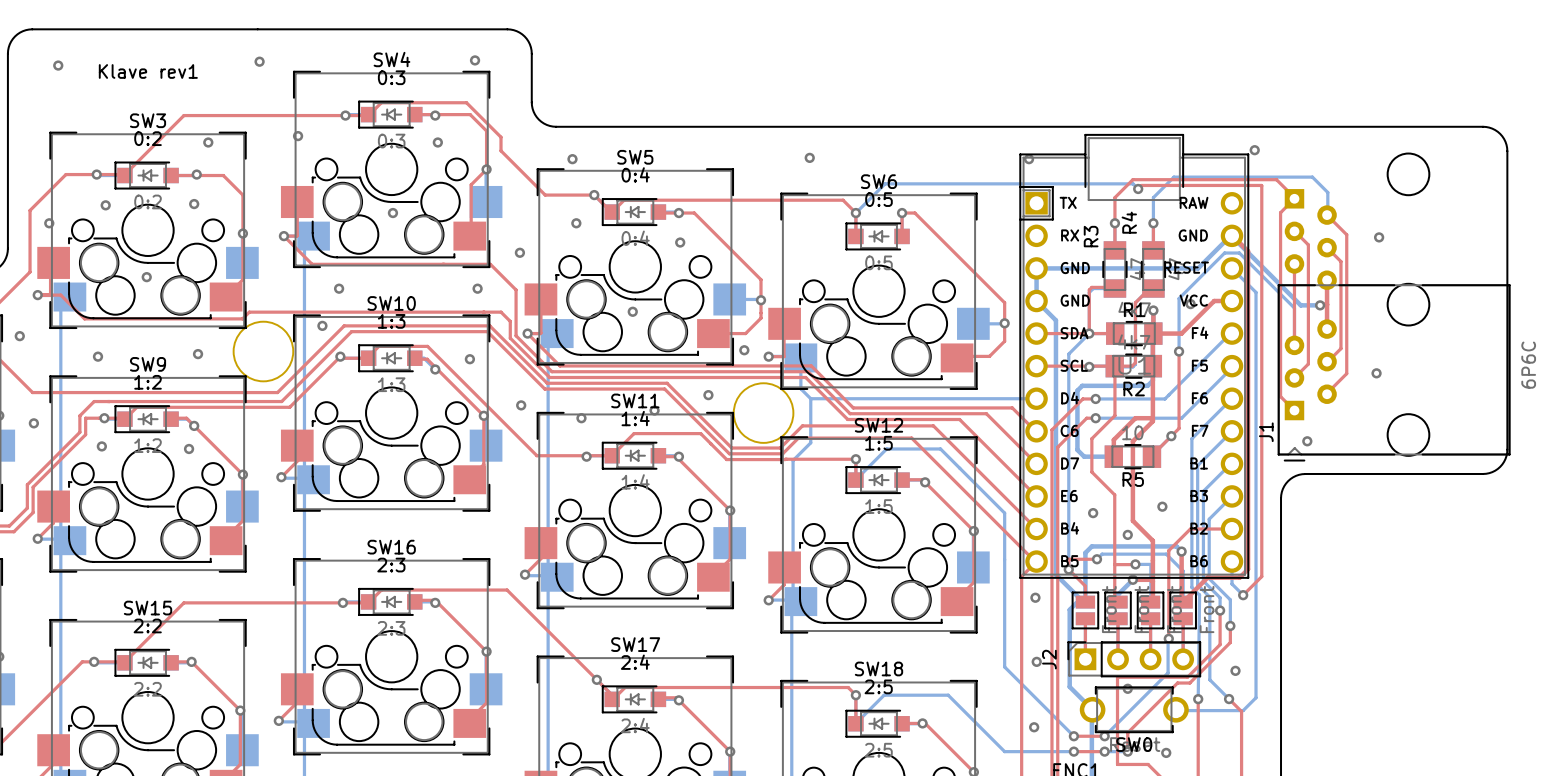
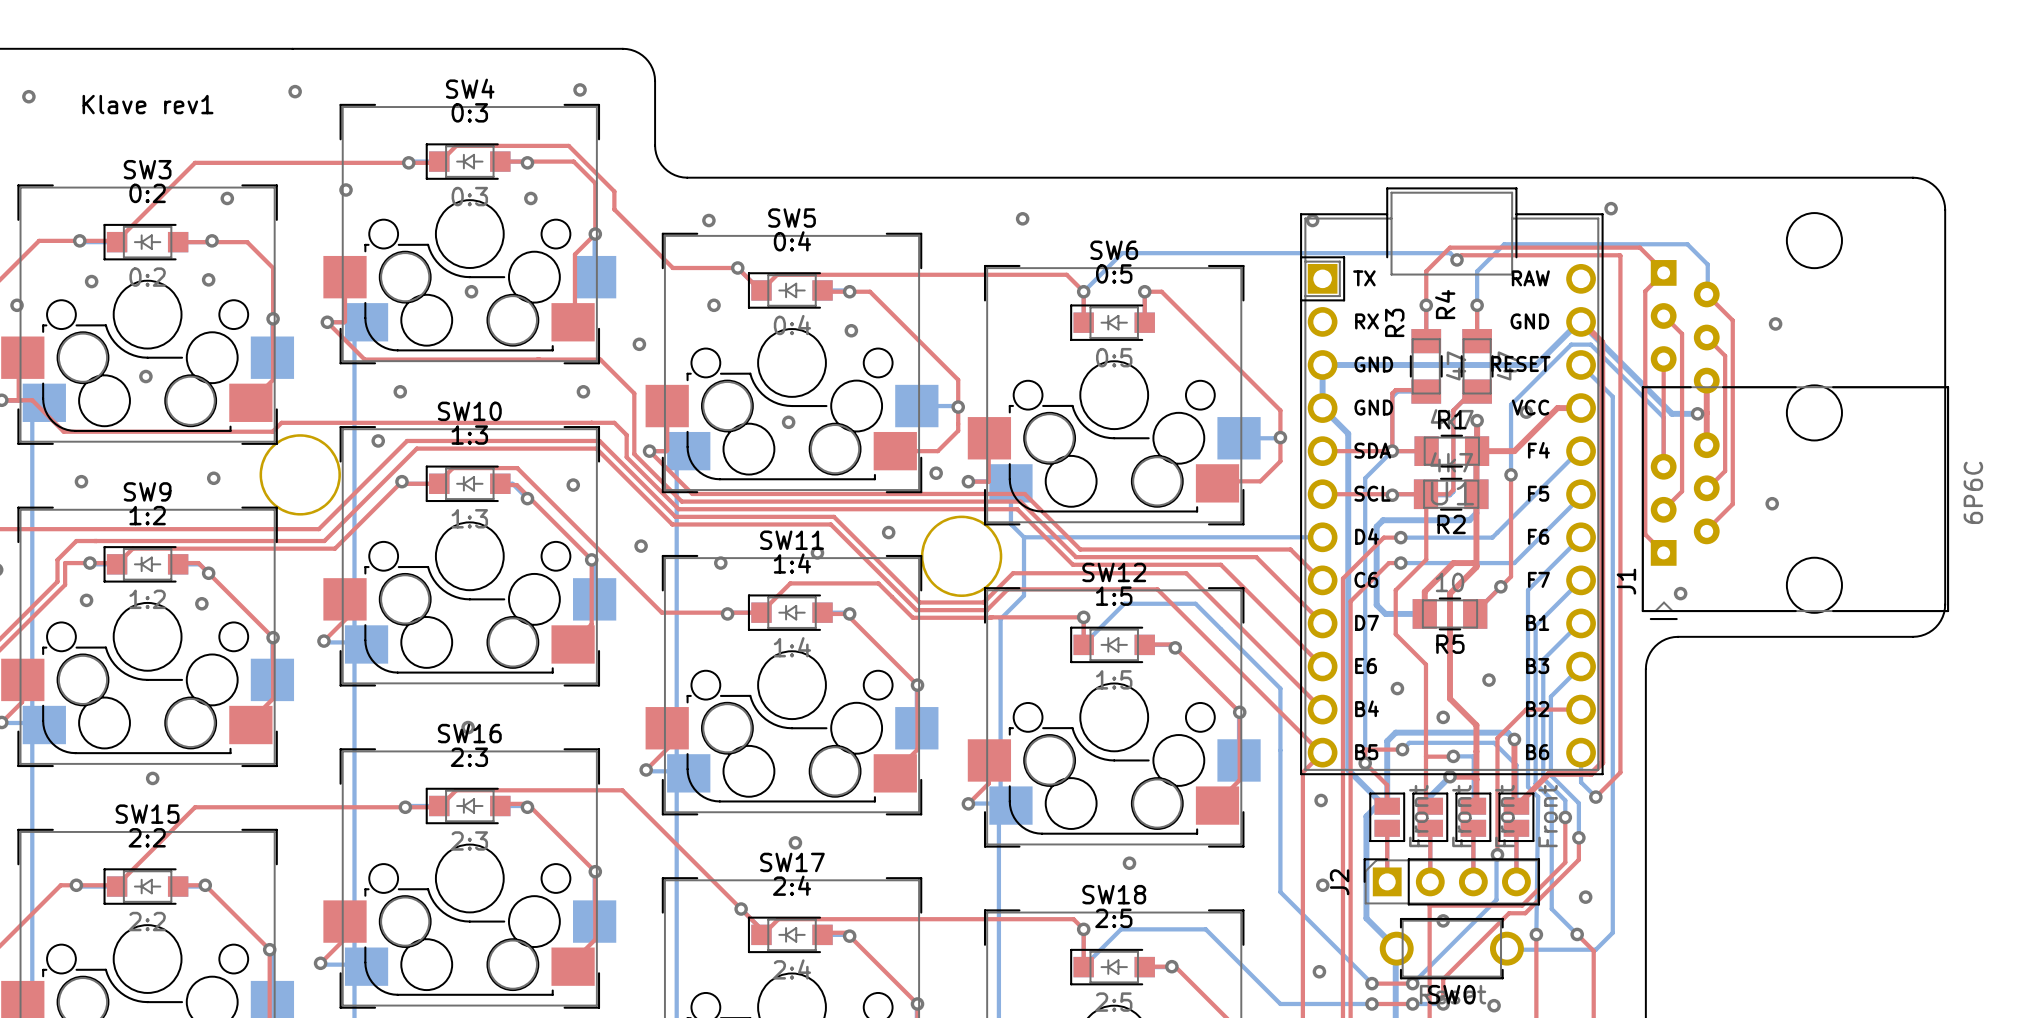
via: none -> (468, 727)
via: none -> (152, 778)
via: none -> (795, 842)
via: none -> (1129, 863)

